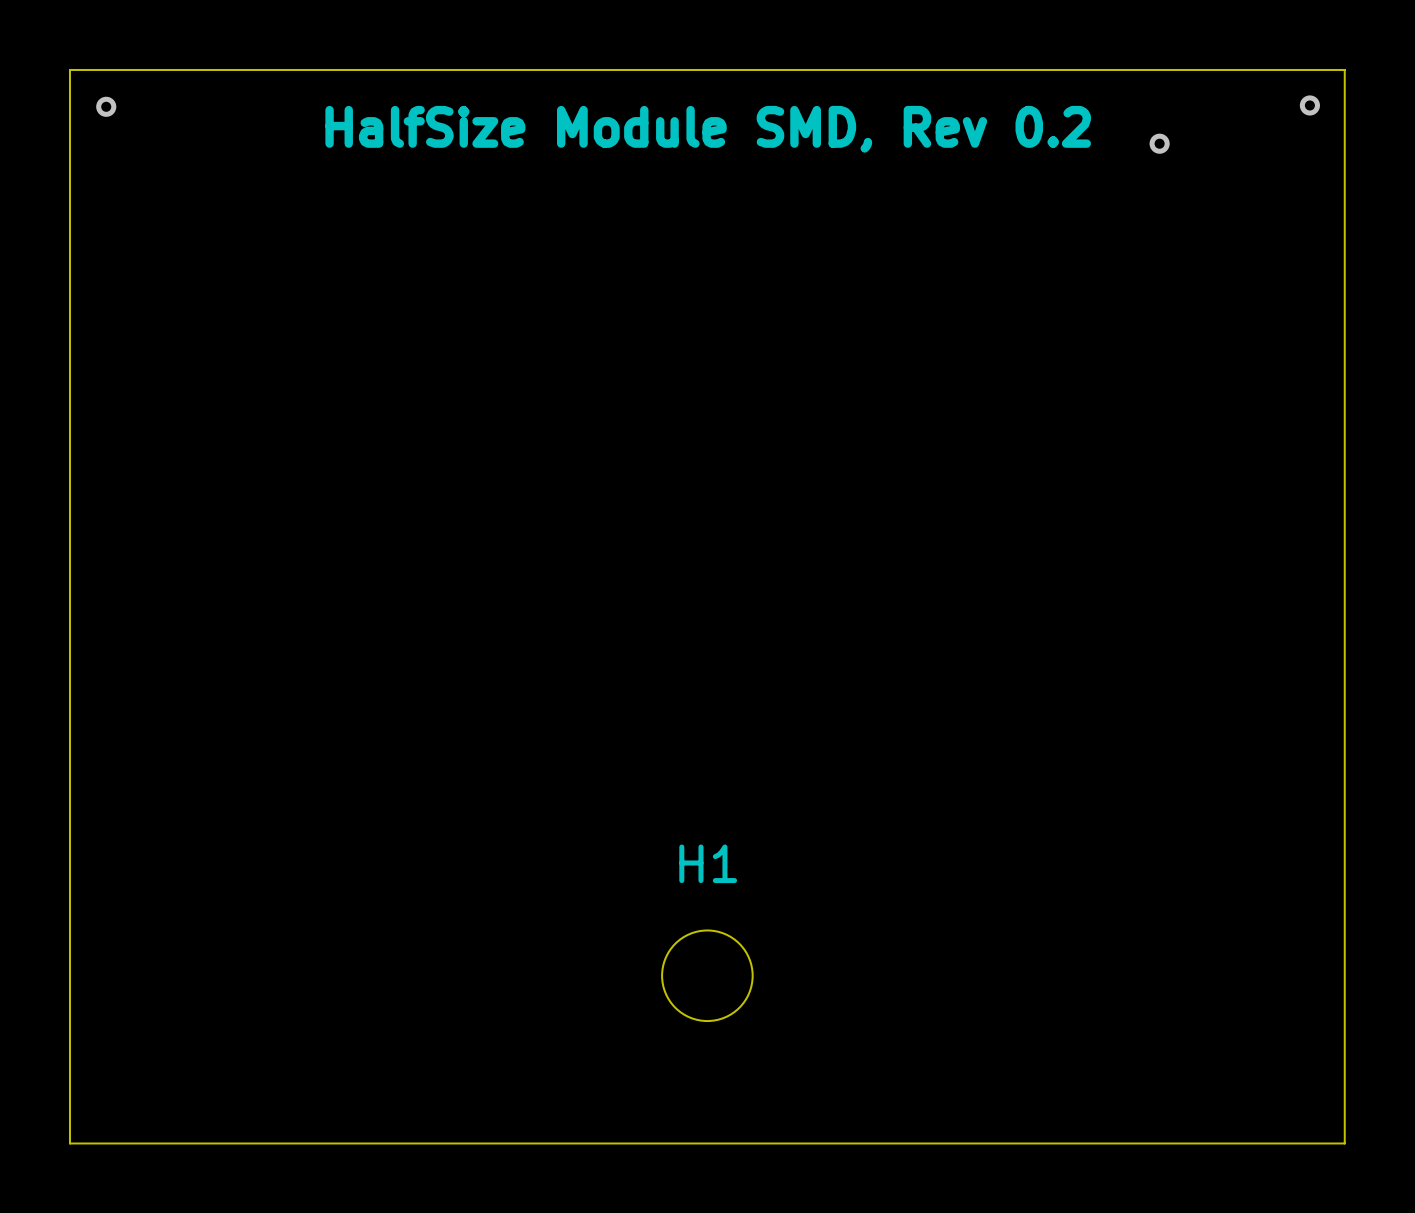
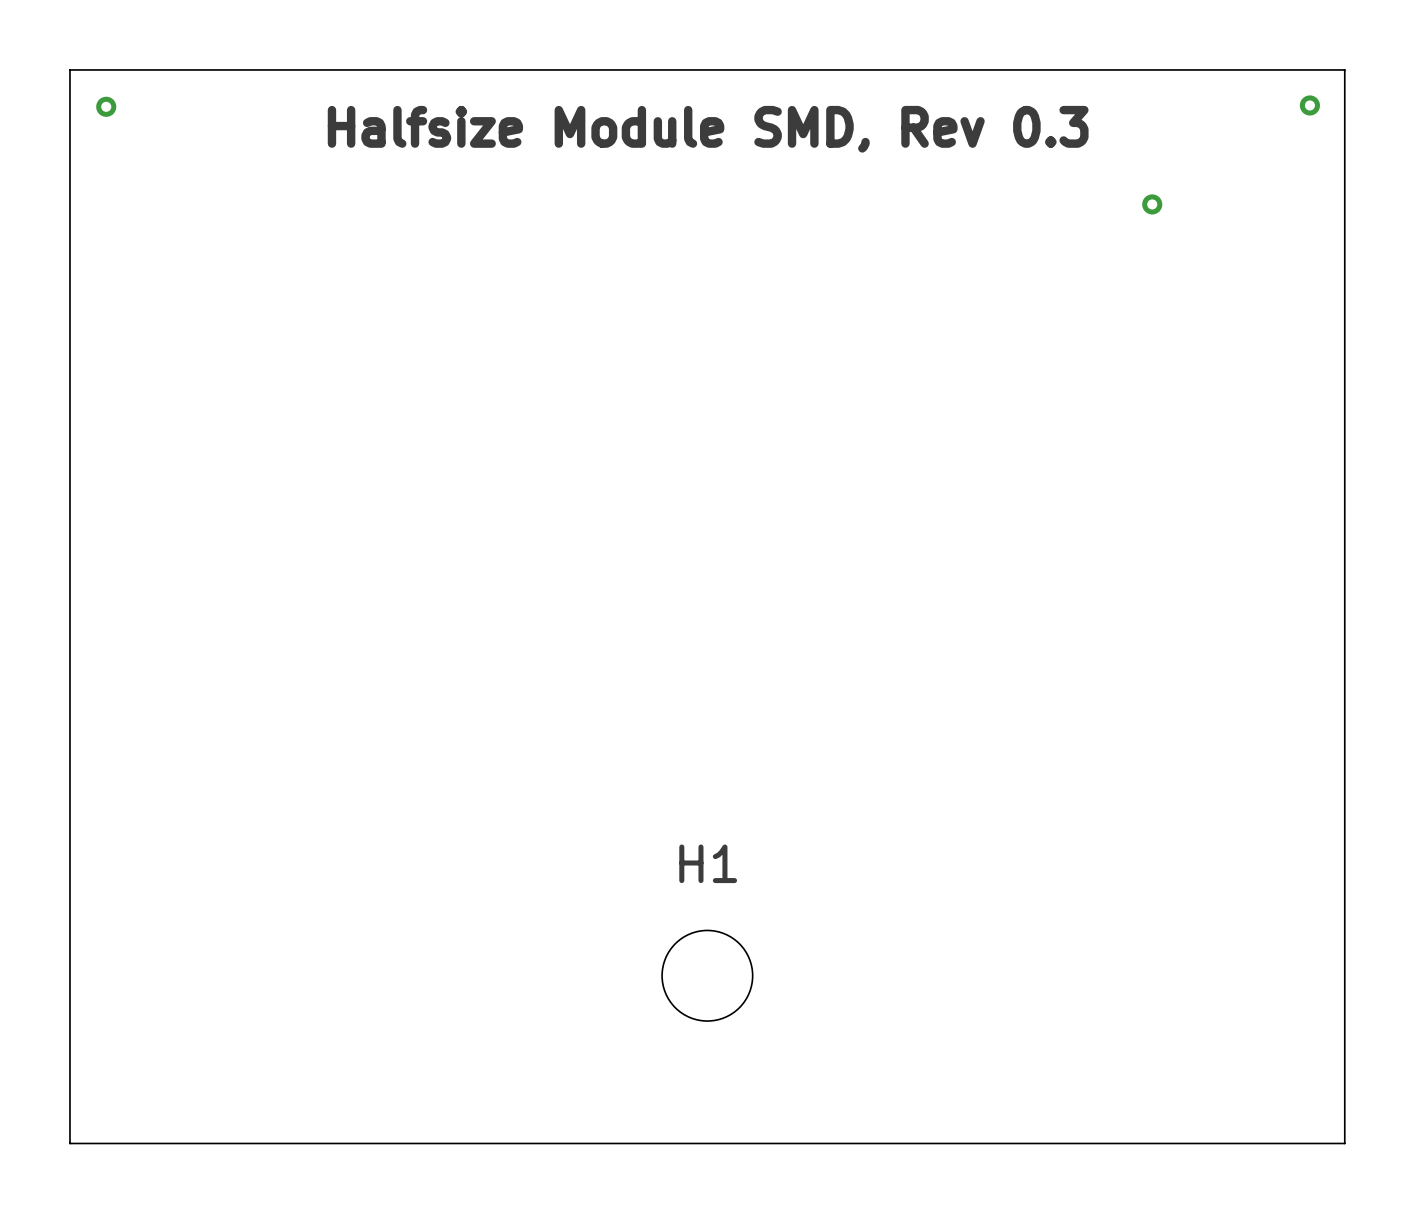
text: HalfSize Module SMD, Rev 0.2 (708, 129) -> Halfsize Module SMD, Rev 0.3 (708, 129)
via position: (1159, 143) -> (1152, 204)

